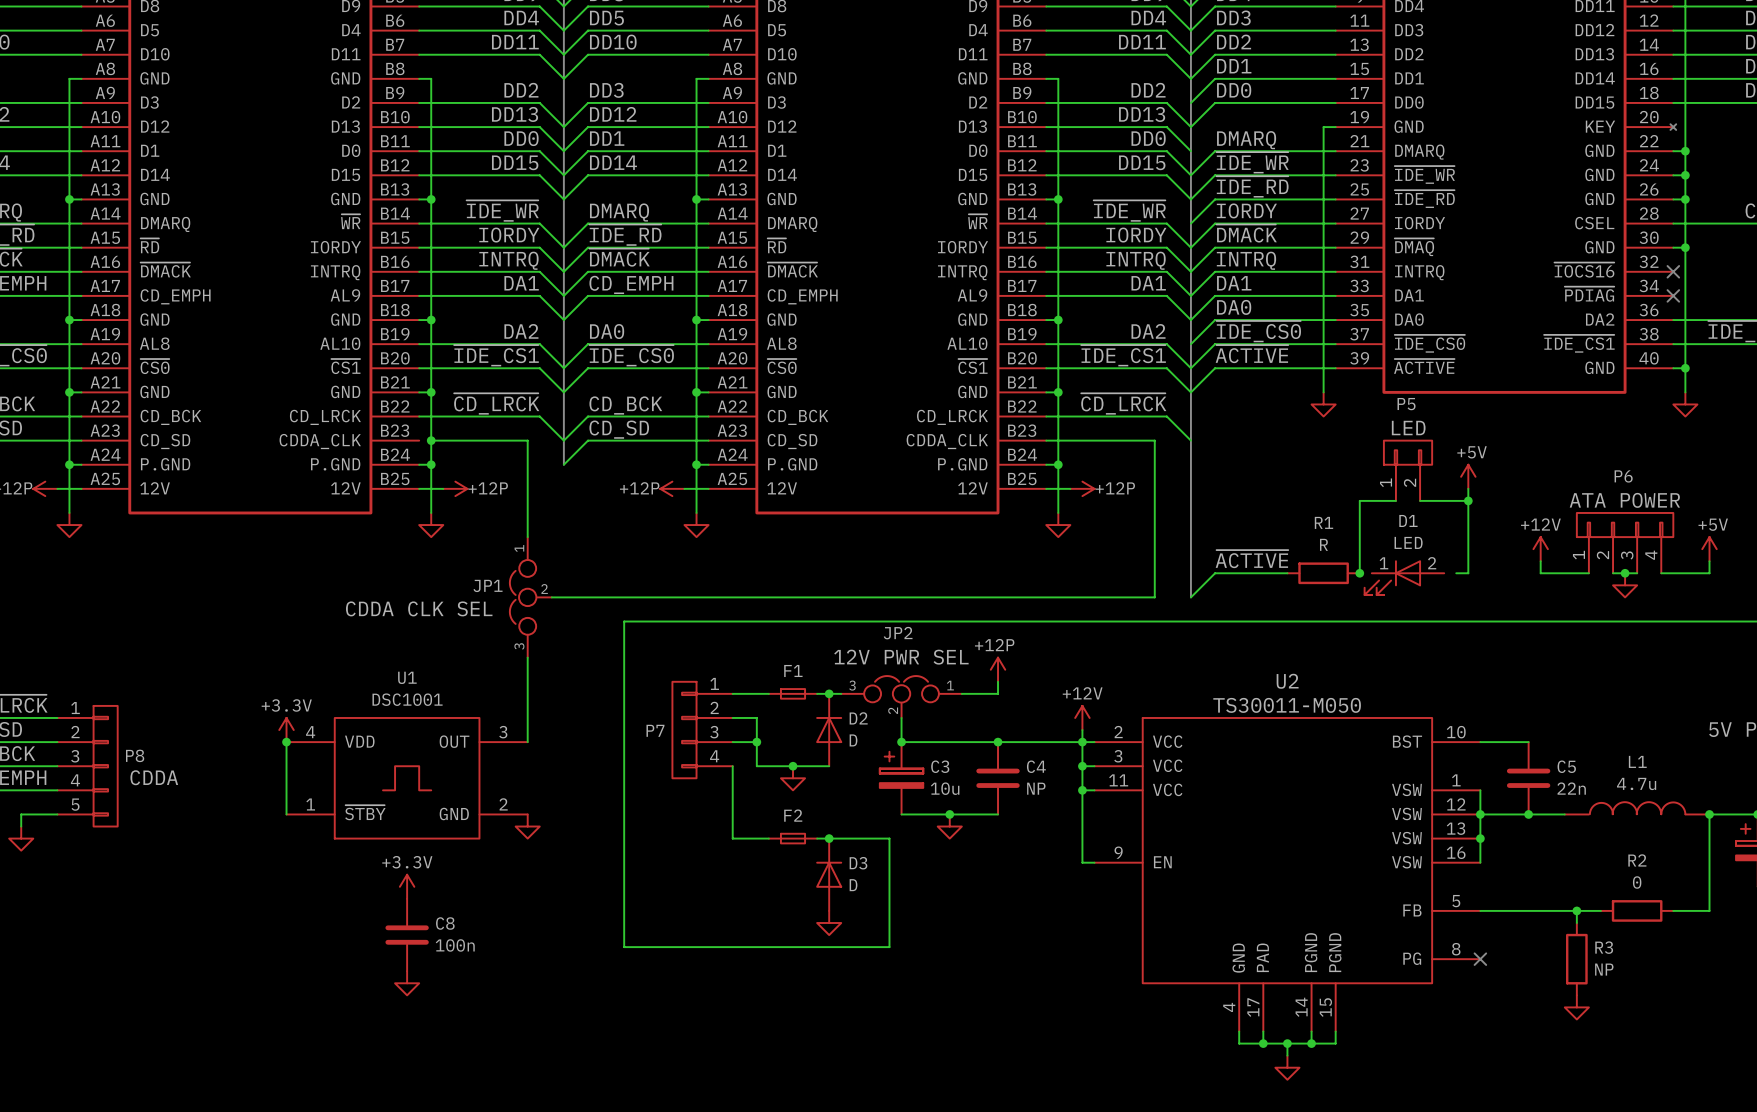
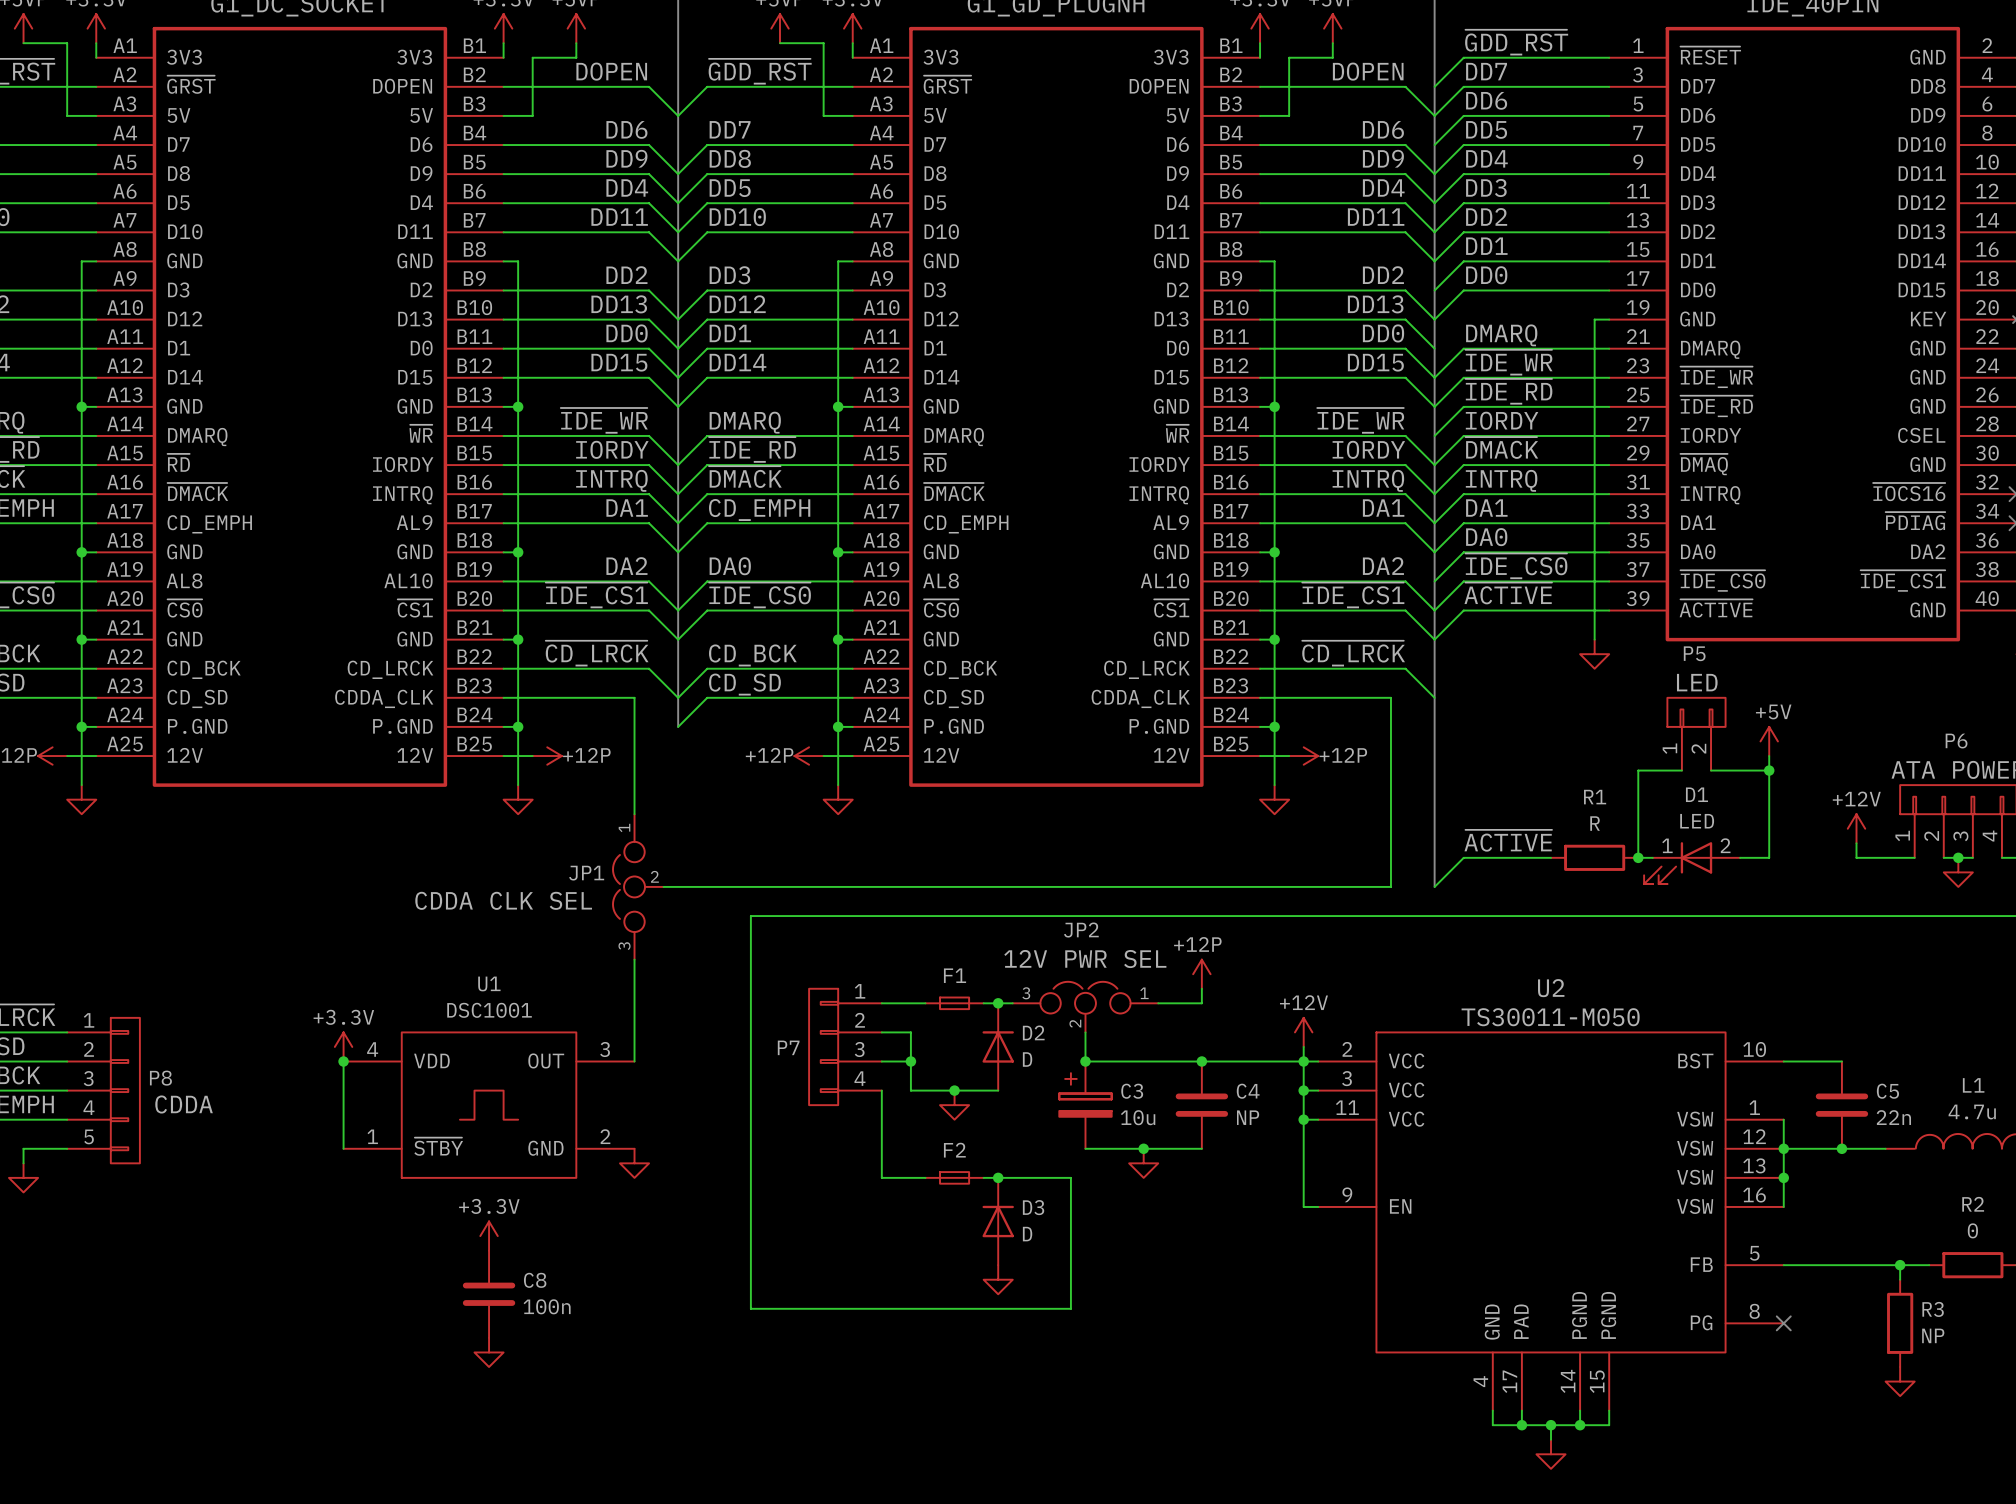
wire: none -> (503, 697) (518, 697)
junction: (431, 440) -> none
wire: none -> (1638, 857) (1652, 857)
wire: none -> (1740, 857) (1754, 857)

